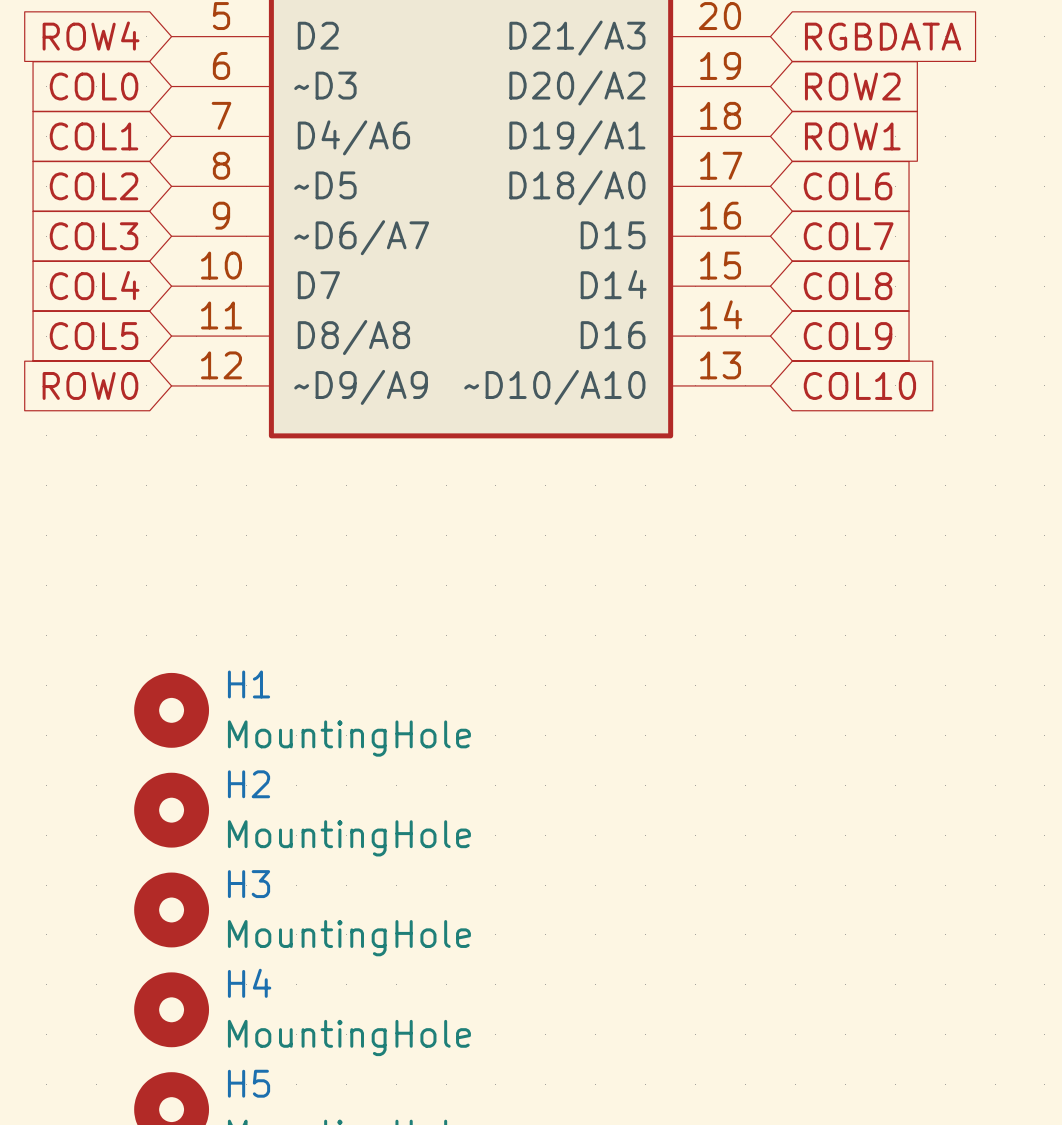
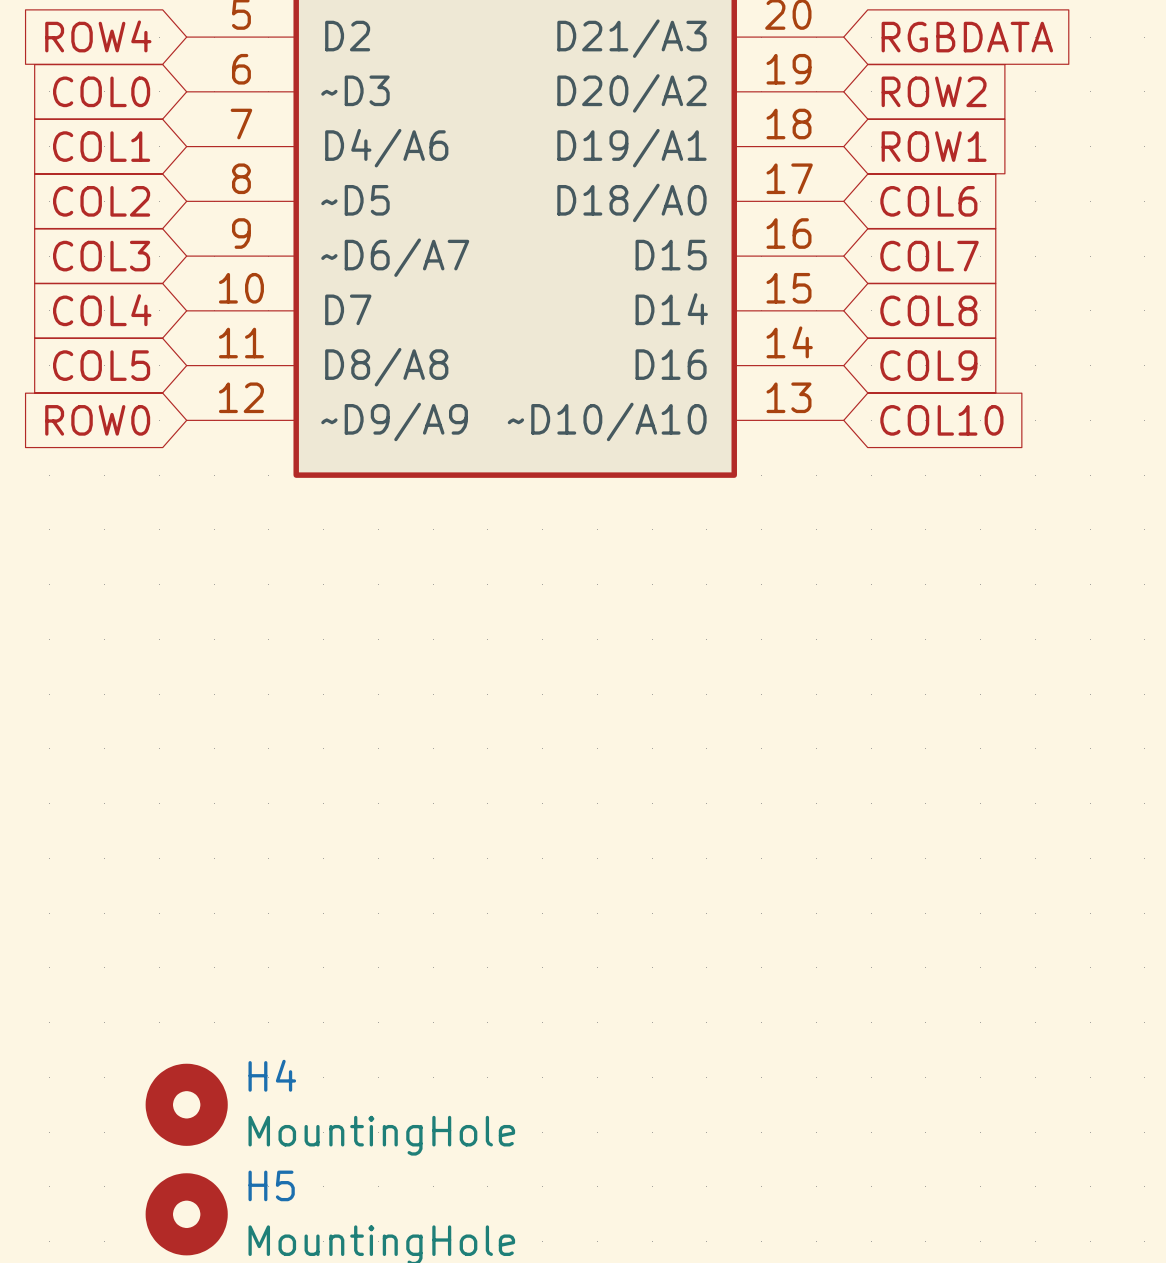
H1: MountingHole (171, 710) -> none
H2: MountingHole (171, 810) -> none
H3: MountingHole (171, 909) -> none

